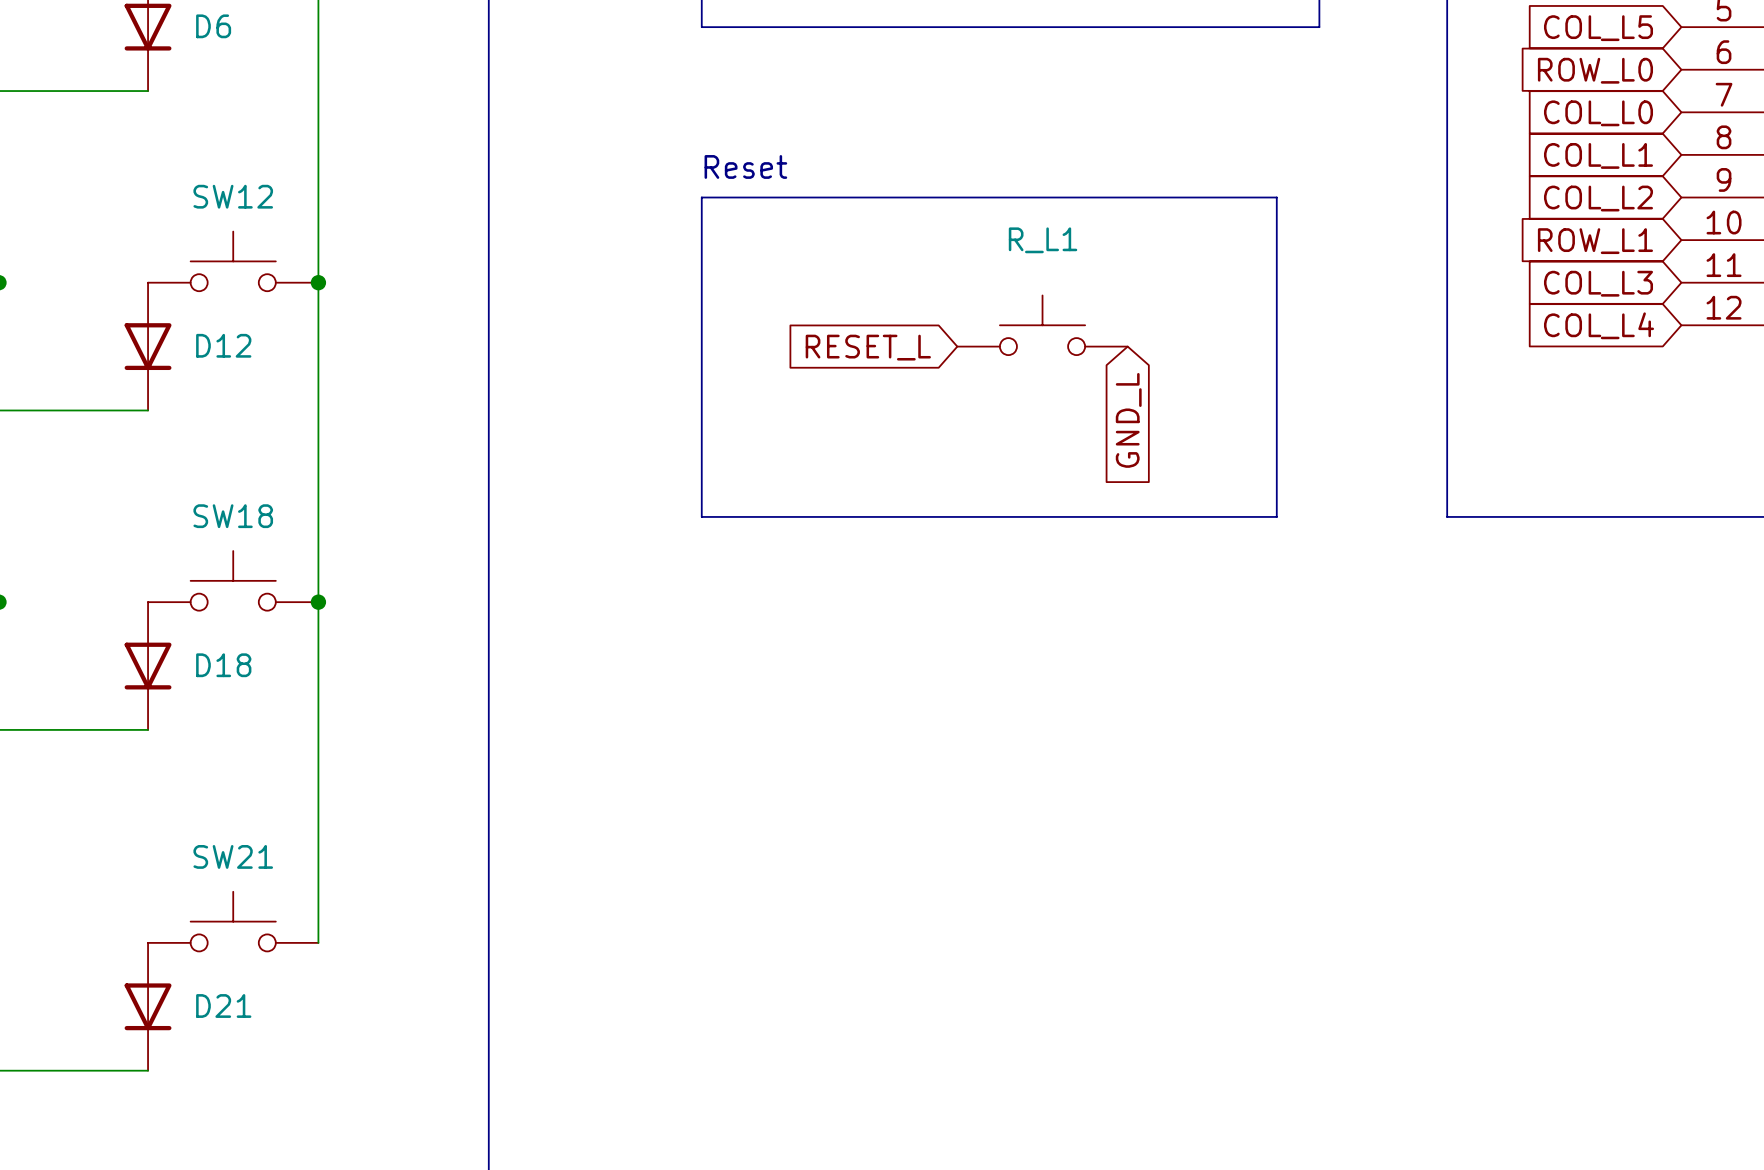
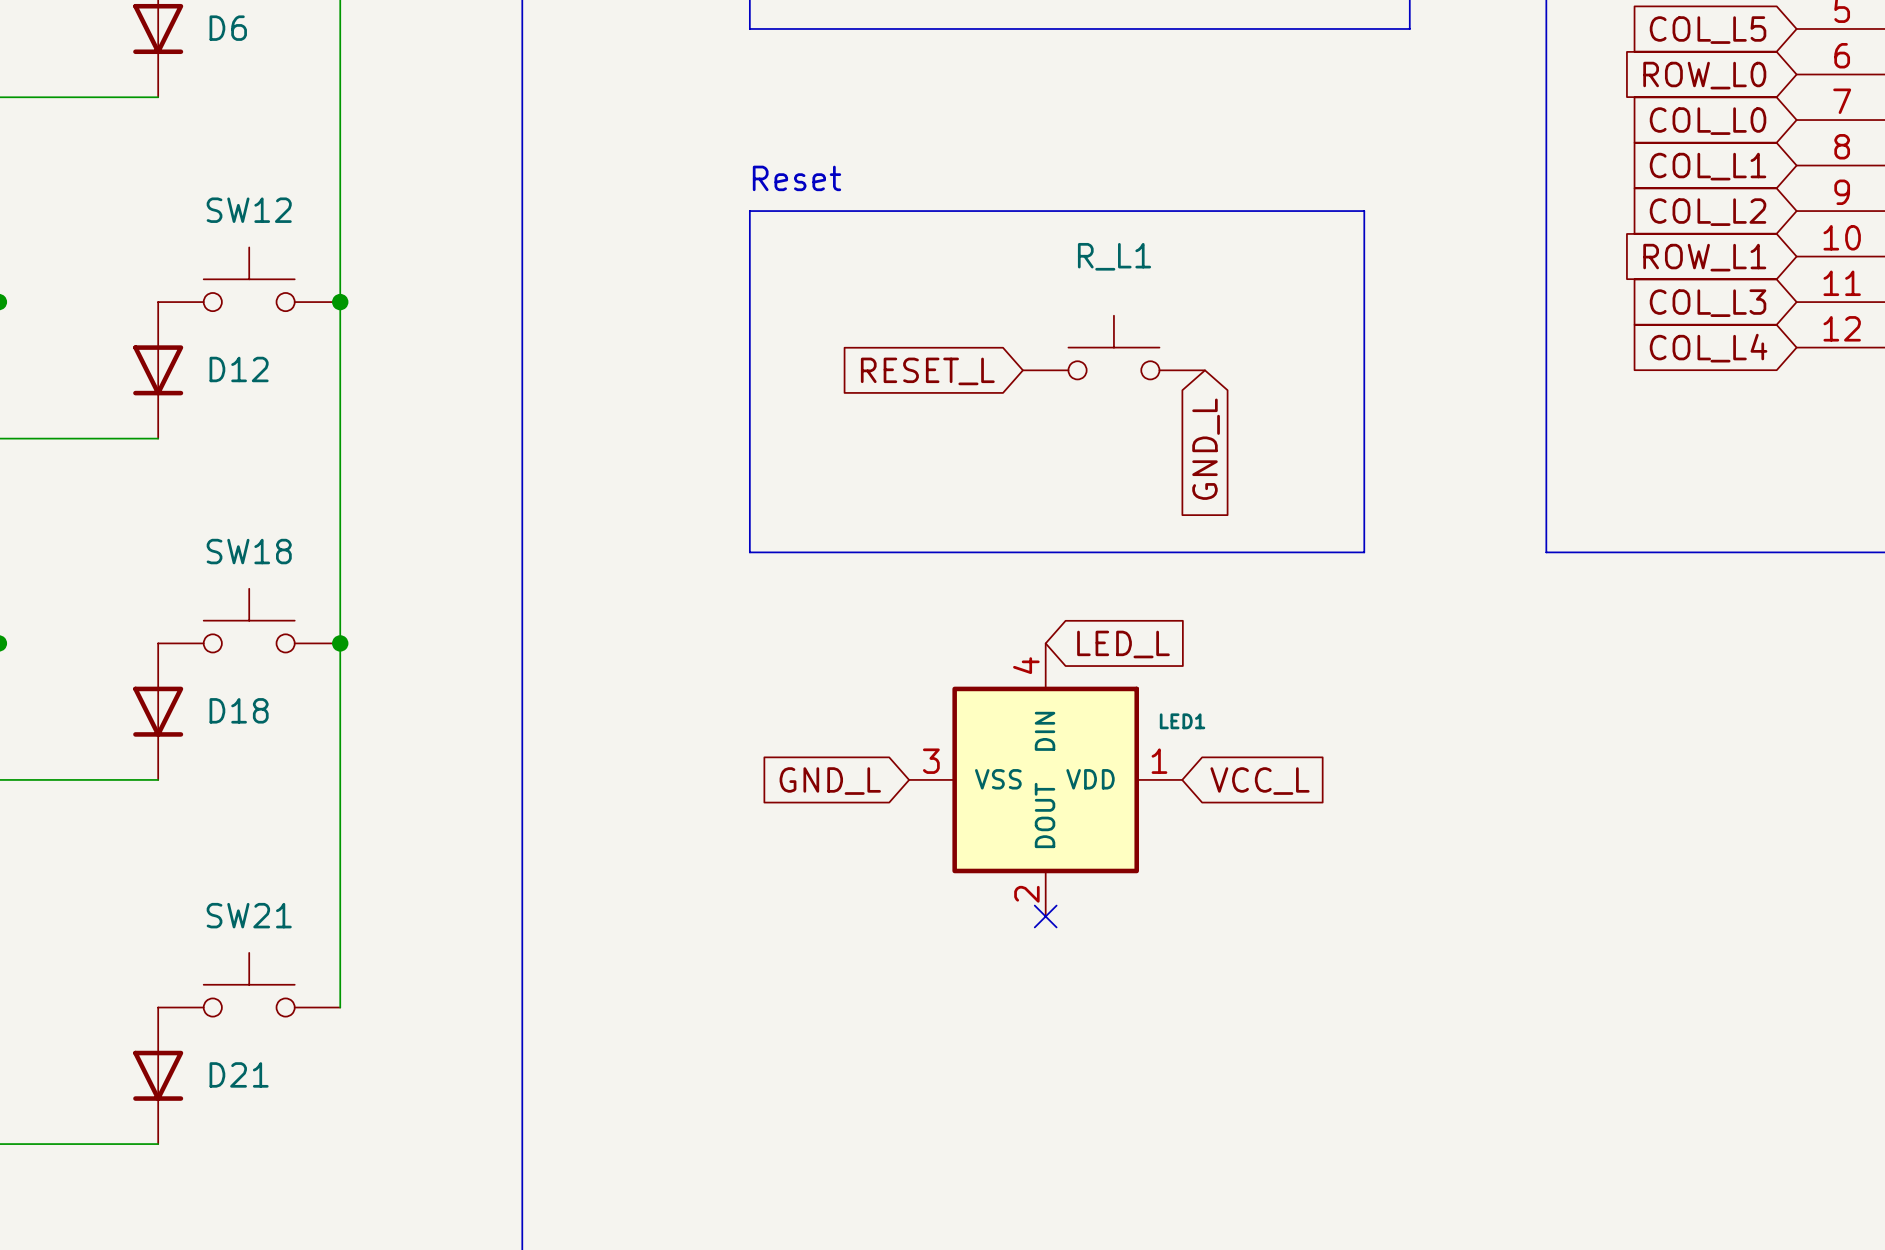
global label: none -> LED_L (1123, 644)
LED1: none -> (1045, 779)
global label: none -> GND_L (830, 781)
global label: none -> VCC_L (1260, 781)
no-connect mark: none -> (1045, 916)

